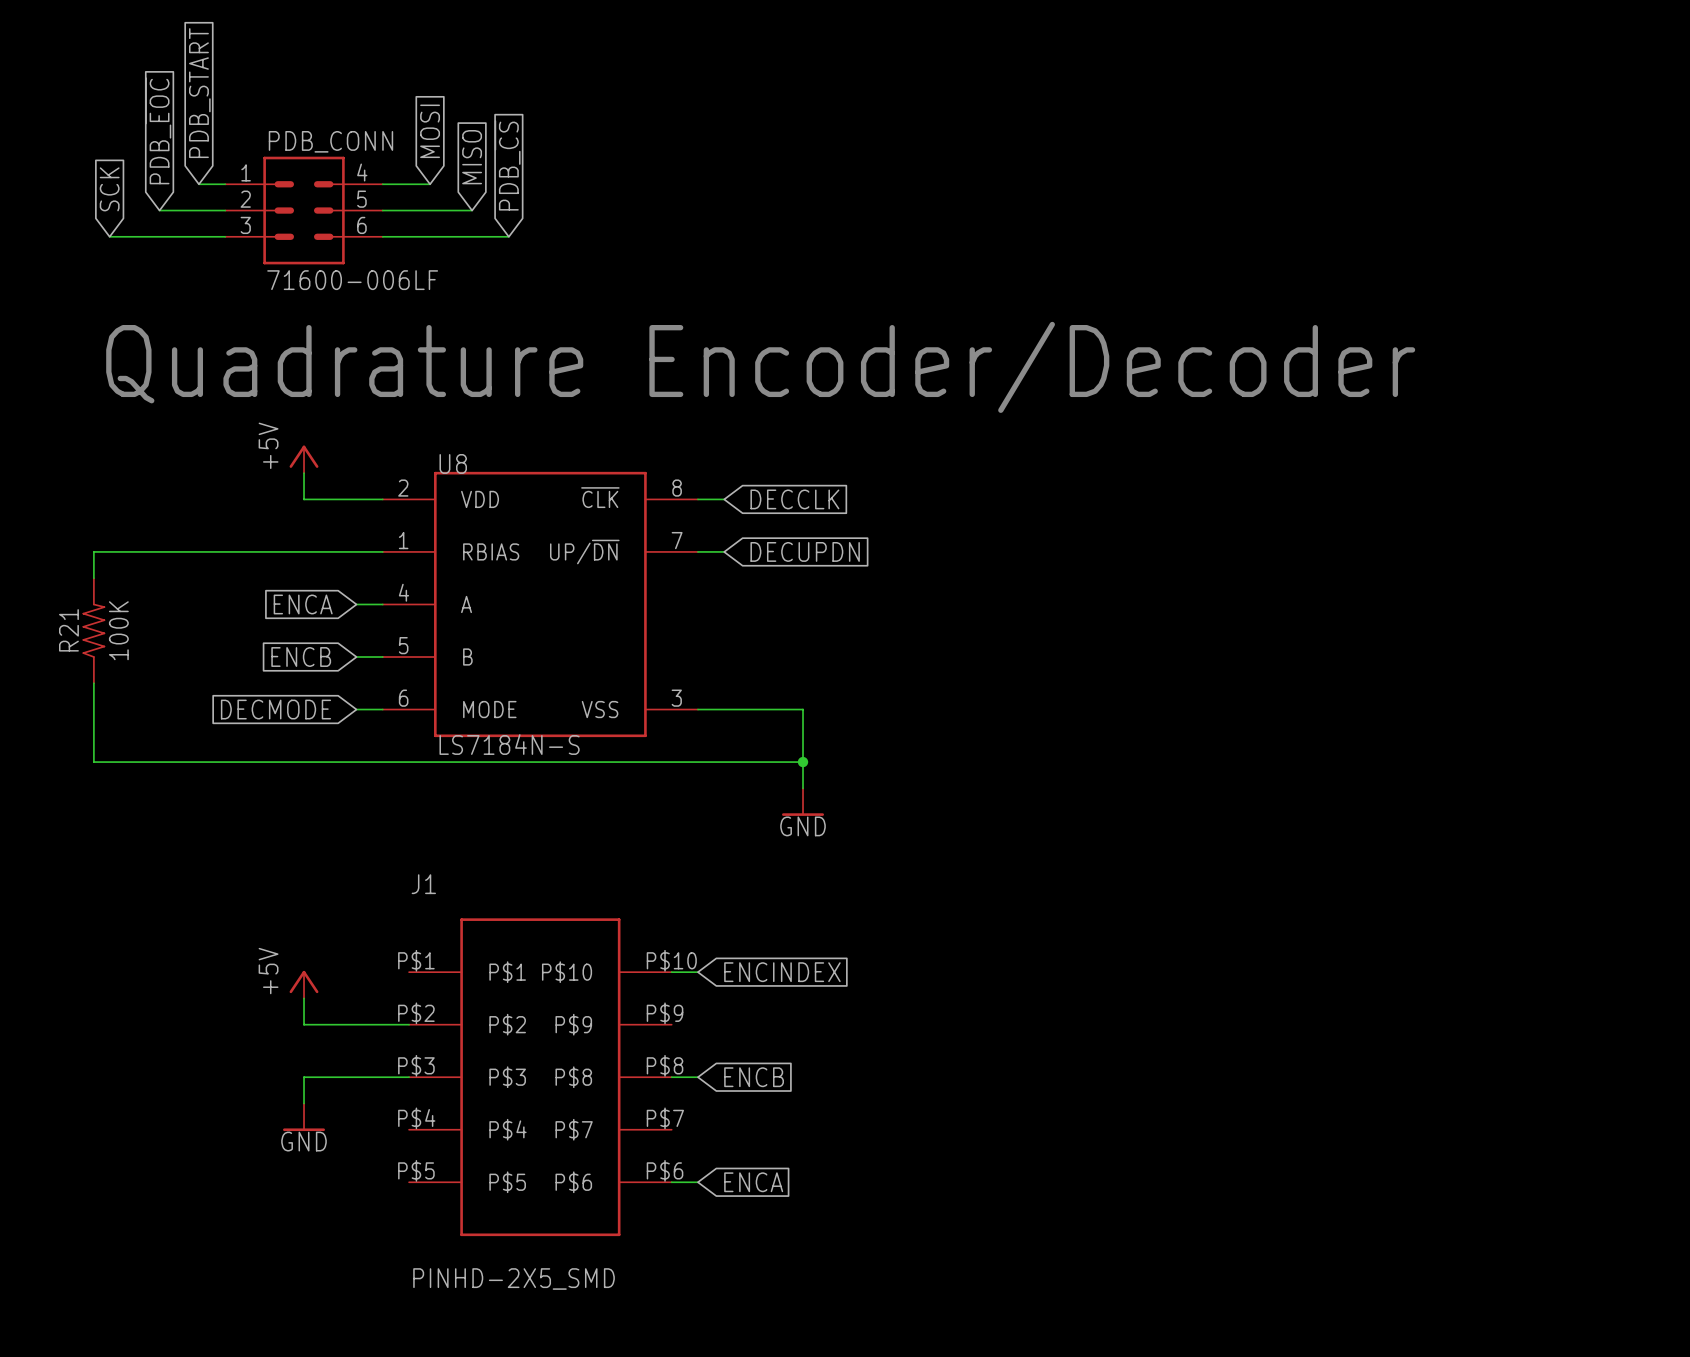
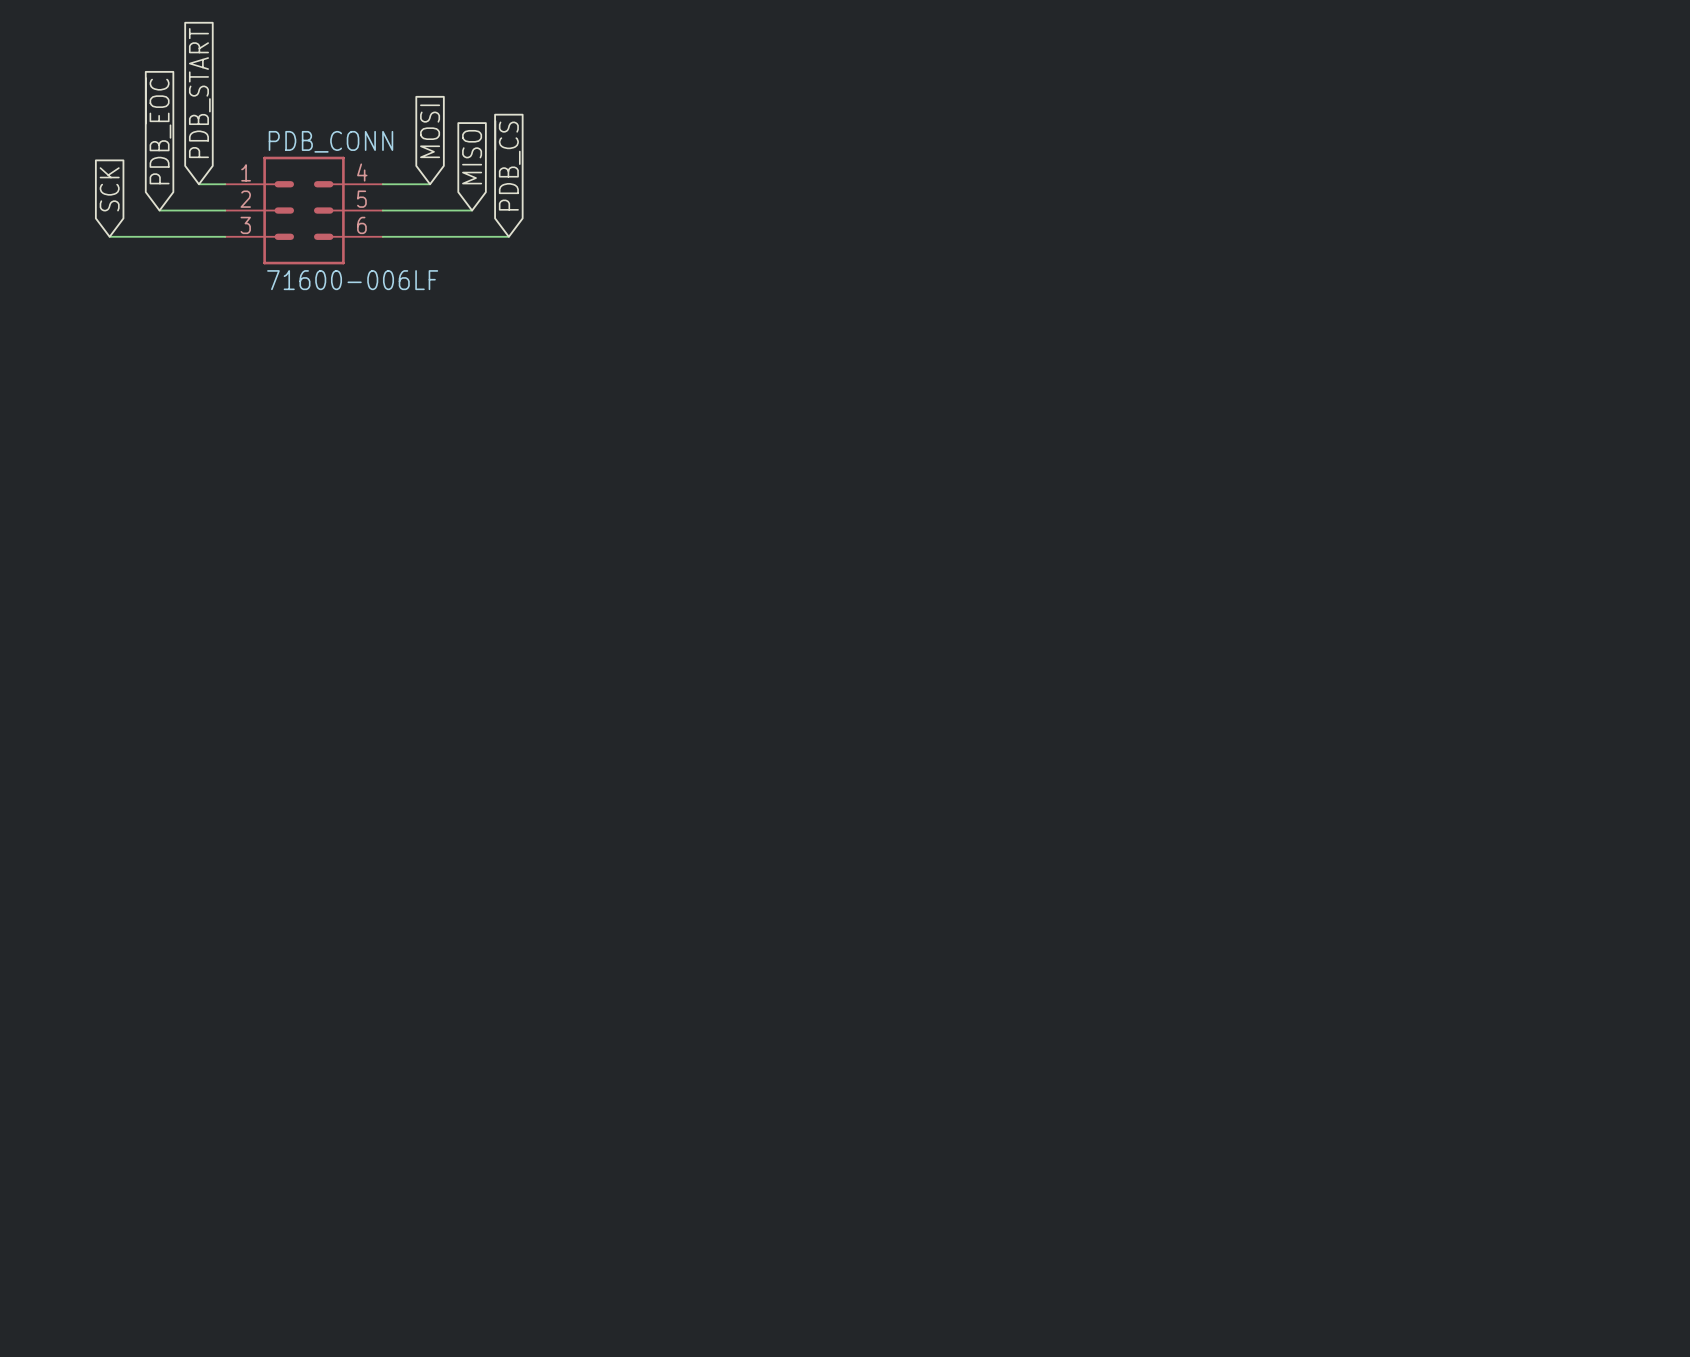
text: Quadrature Encoder/Decoder (760, 367) -> none
power symbol: +5V (304, 459) -> none
wire: (304, 473) (304, 499) (382, 499) -> none
wire: (697, 499) (724, 499) -> none
global label: DECCLK (794, 499) -> none
wire: (382, 551) (93, 551) (93, 578) -> none
wire: (697, 551) (724, 551) -> none
global label: DECUPDN (805, 551) -> none
global label: ENCA (303, 604) -> none
wire: (356, 604) (382, 604) -> none
U8: LS7184N-S (540, 604) -> none
R21: 100K (93, 630) -> none
global label: ENCB (301, 657) -> none
wire: (356, 657) (382, 657) -> none
wire: (93, 683) (93, 762) (803, 762) -> none
global label: DECMODE (275, 709) -> none
wire: (356, 709) (382, 709) -> none
wire: (697, 709) (803, 709) (803, 788) -> none
junction: (803, 762) -> none
power symbol: GND (803, 802) -> none
wire: (671, 972) (697, 972) -> none
global label: ENCINDEX (782, 972) -> none
power symbol: +5V (304, 984) -> none
wire: (304, 998) (304, 1024) (409, 1024) -> none
wire: (409, 1077) (304, 1077) (304, 1103) -> none
J1: PINHD-2X5_SMD (540, 1077) -> none
wire: (671, 1077) (697, 1077) -> none
global label: ENCB (754, 1077) -> none
power symbol: GND (304, 1117) -> none
wire: (671, 1182) (697, 1182) -> none
global label: ENCA (753, 1182) -> none

